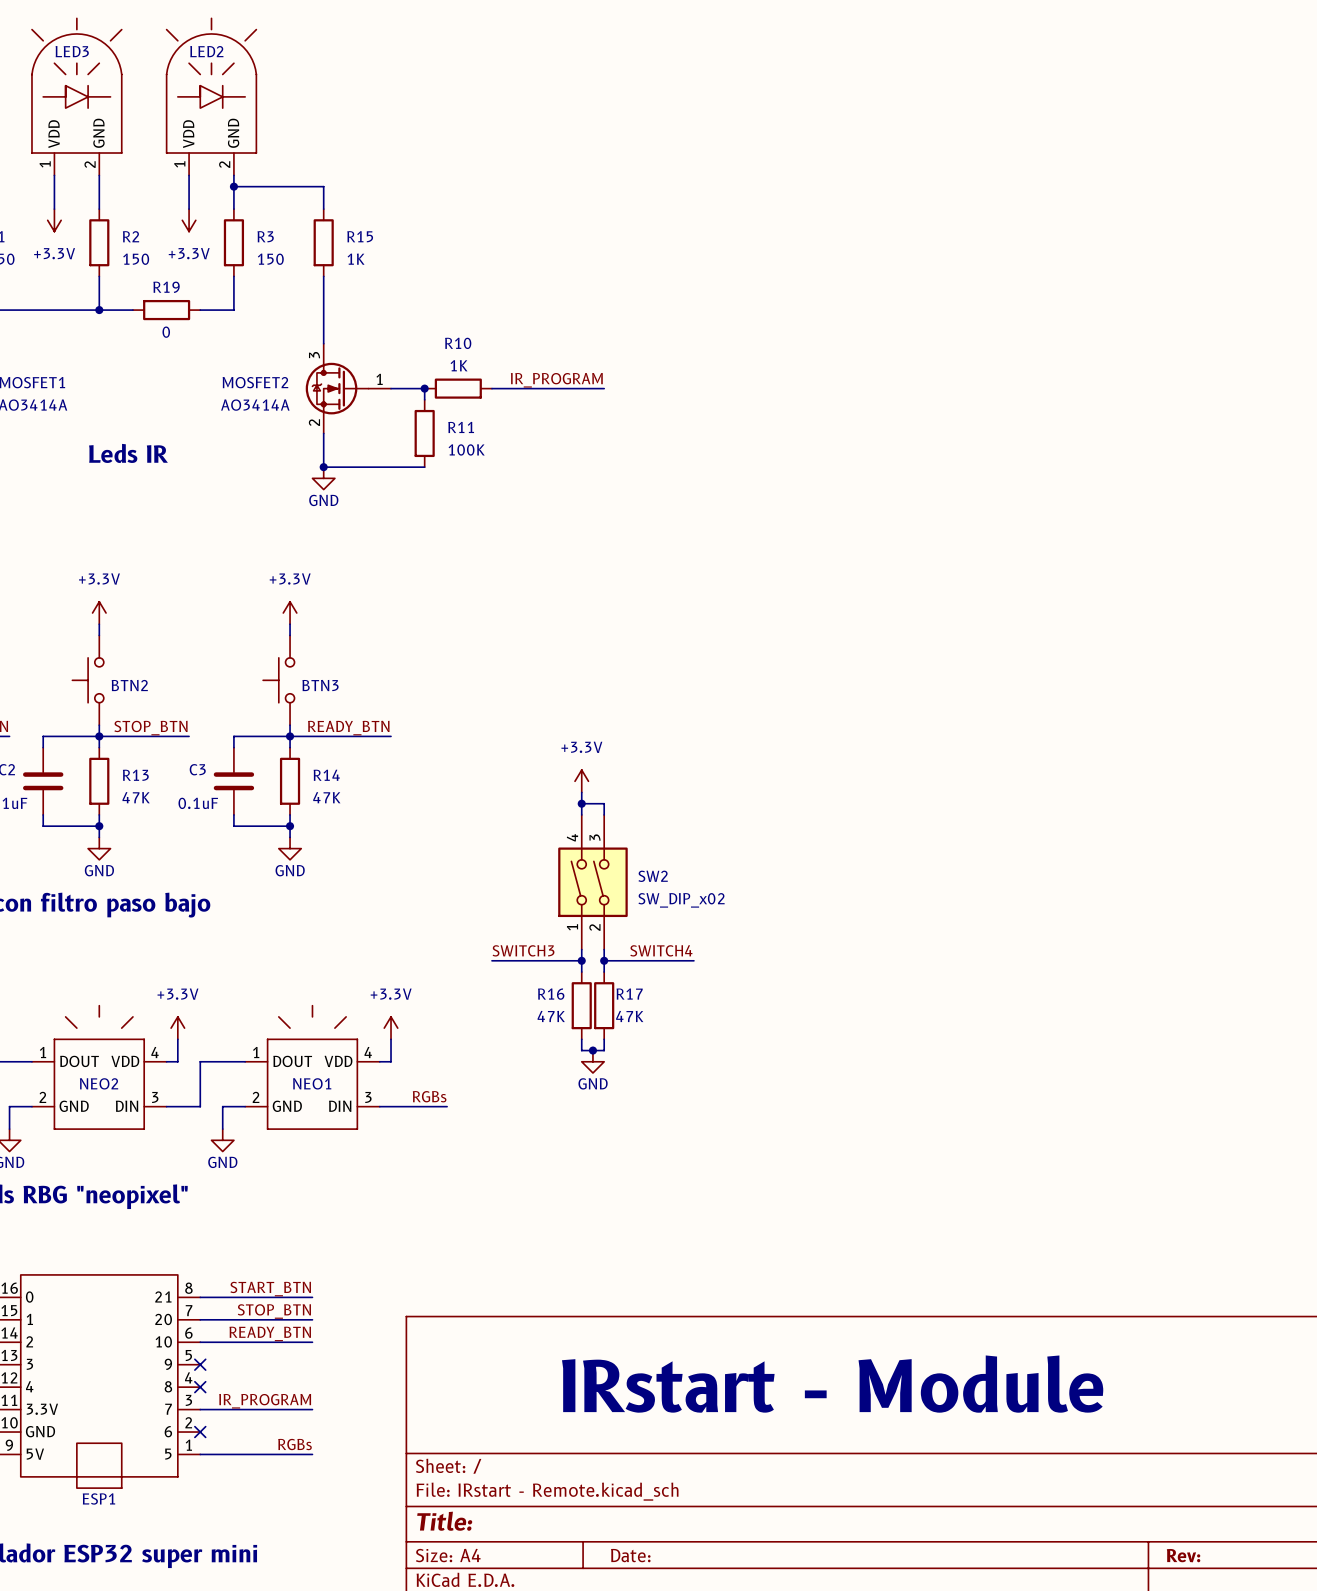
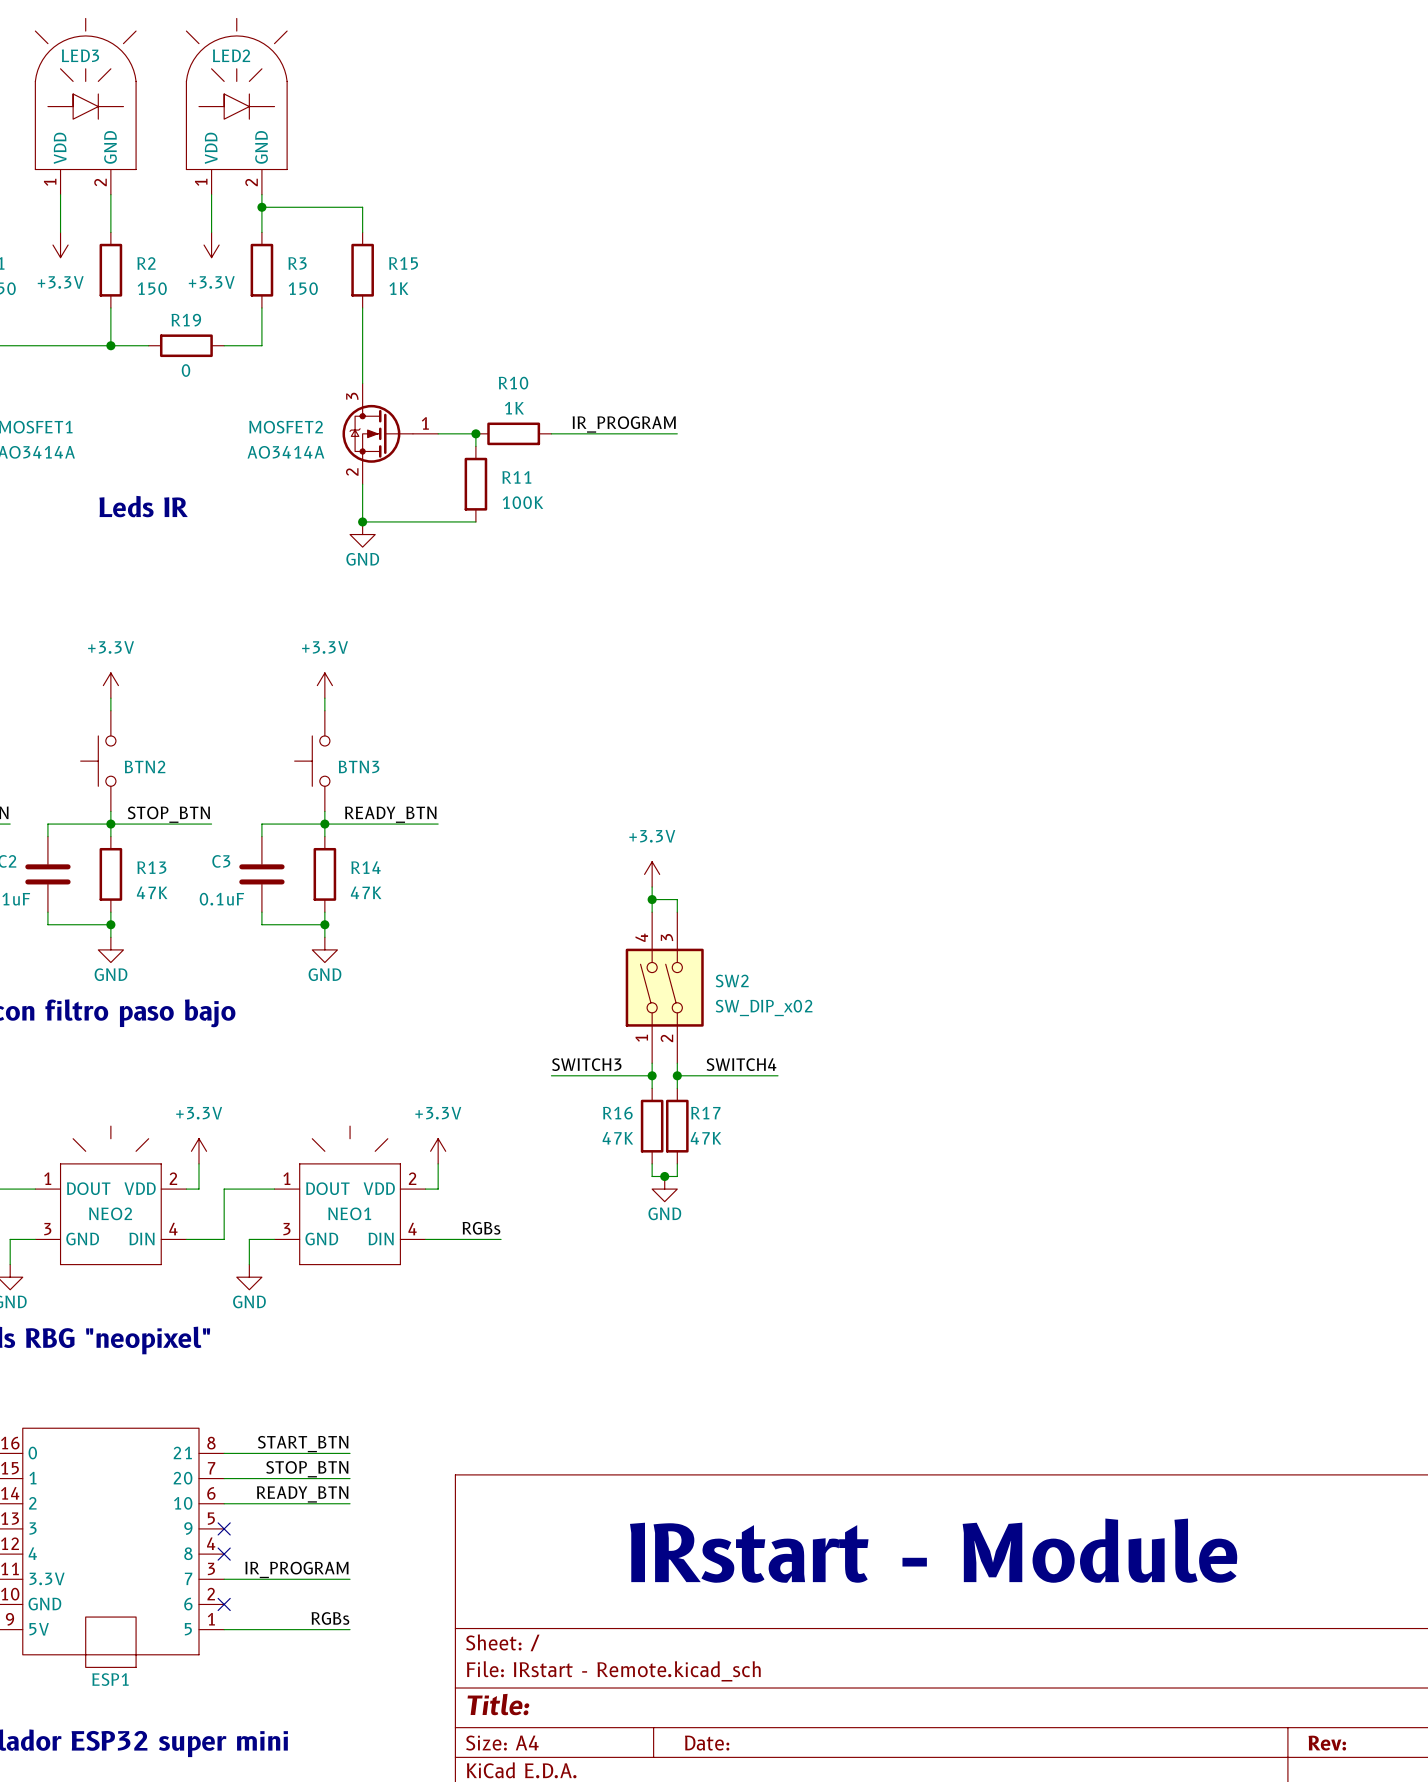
NEO2 pin number: 4 (155, 1052) -> 2 (173, 1178)
NEO1 pin number: 4 (368, 1052) -> 2 (412, 1178)
NEO2 pin number: 2 (42, 1097) -> 3 (47, 1229)
NEO2 pin number: 3 (155, 1097) -> 4 (173, 1229)
NEO1 pin number: 2 (256, 1097) -> 3 (286, 1229)
NEO1 pin number: 3 (368, 1097) -> 4 (412, 1229)

